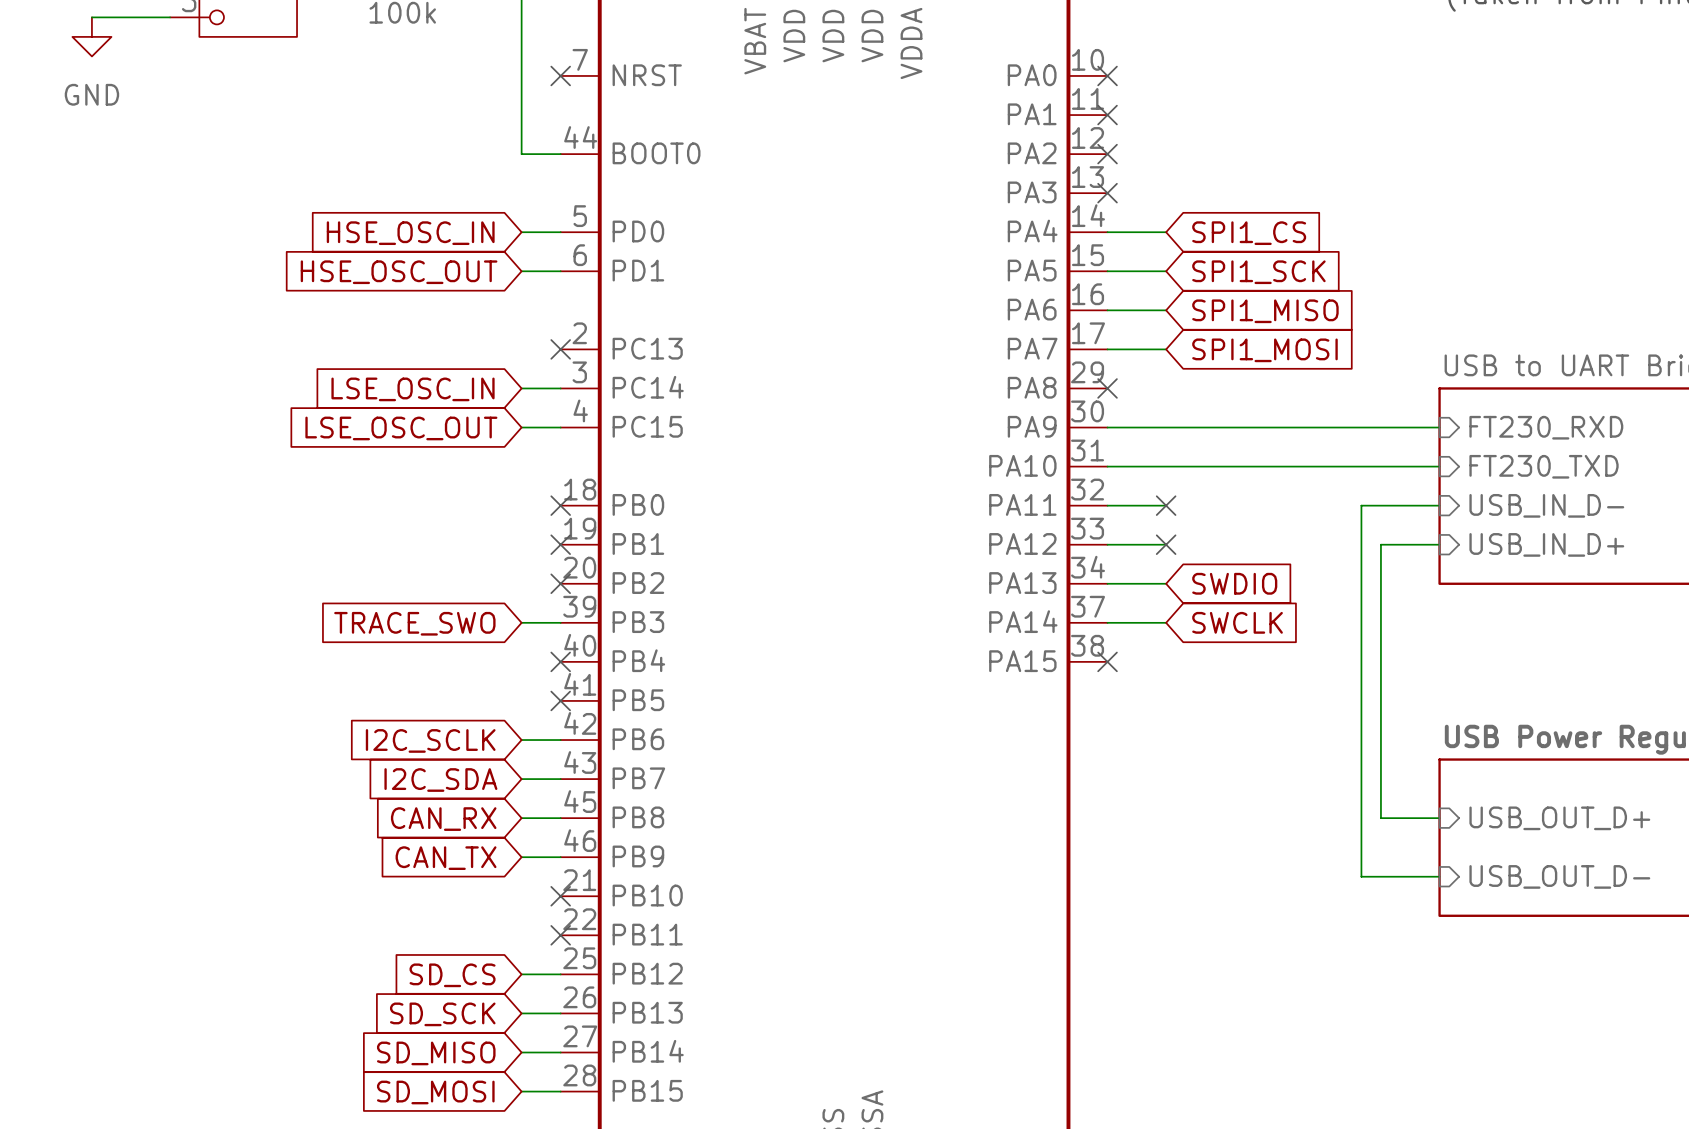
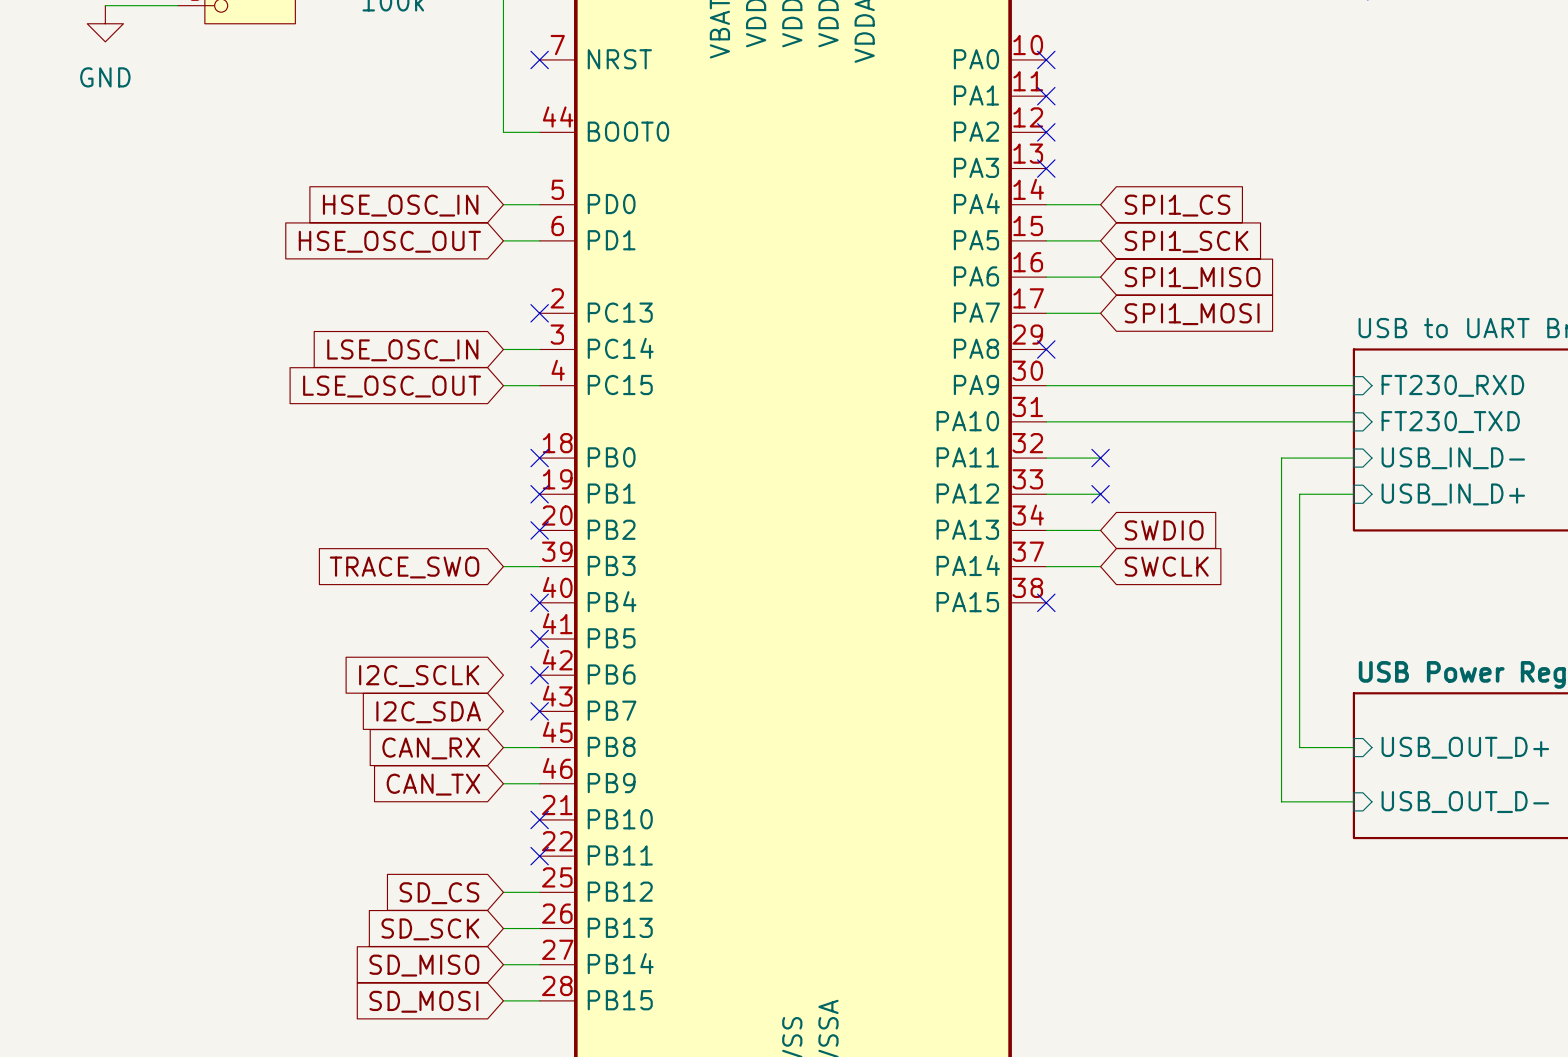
wire: (521, 740) (560, 740) -> none
no-connect mark: none -> (539, 675)
wire: (521, 779) (560, 779) -> none
no-connect mark: none -> (539, 711)

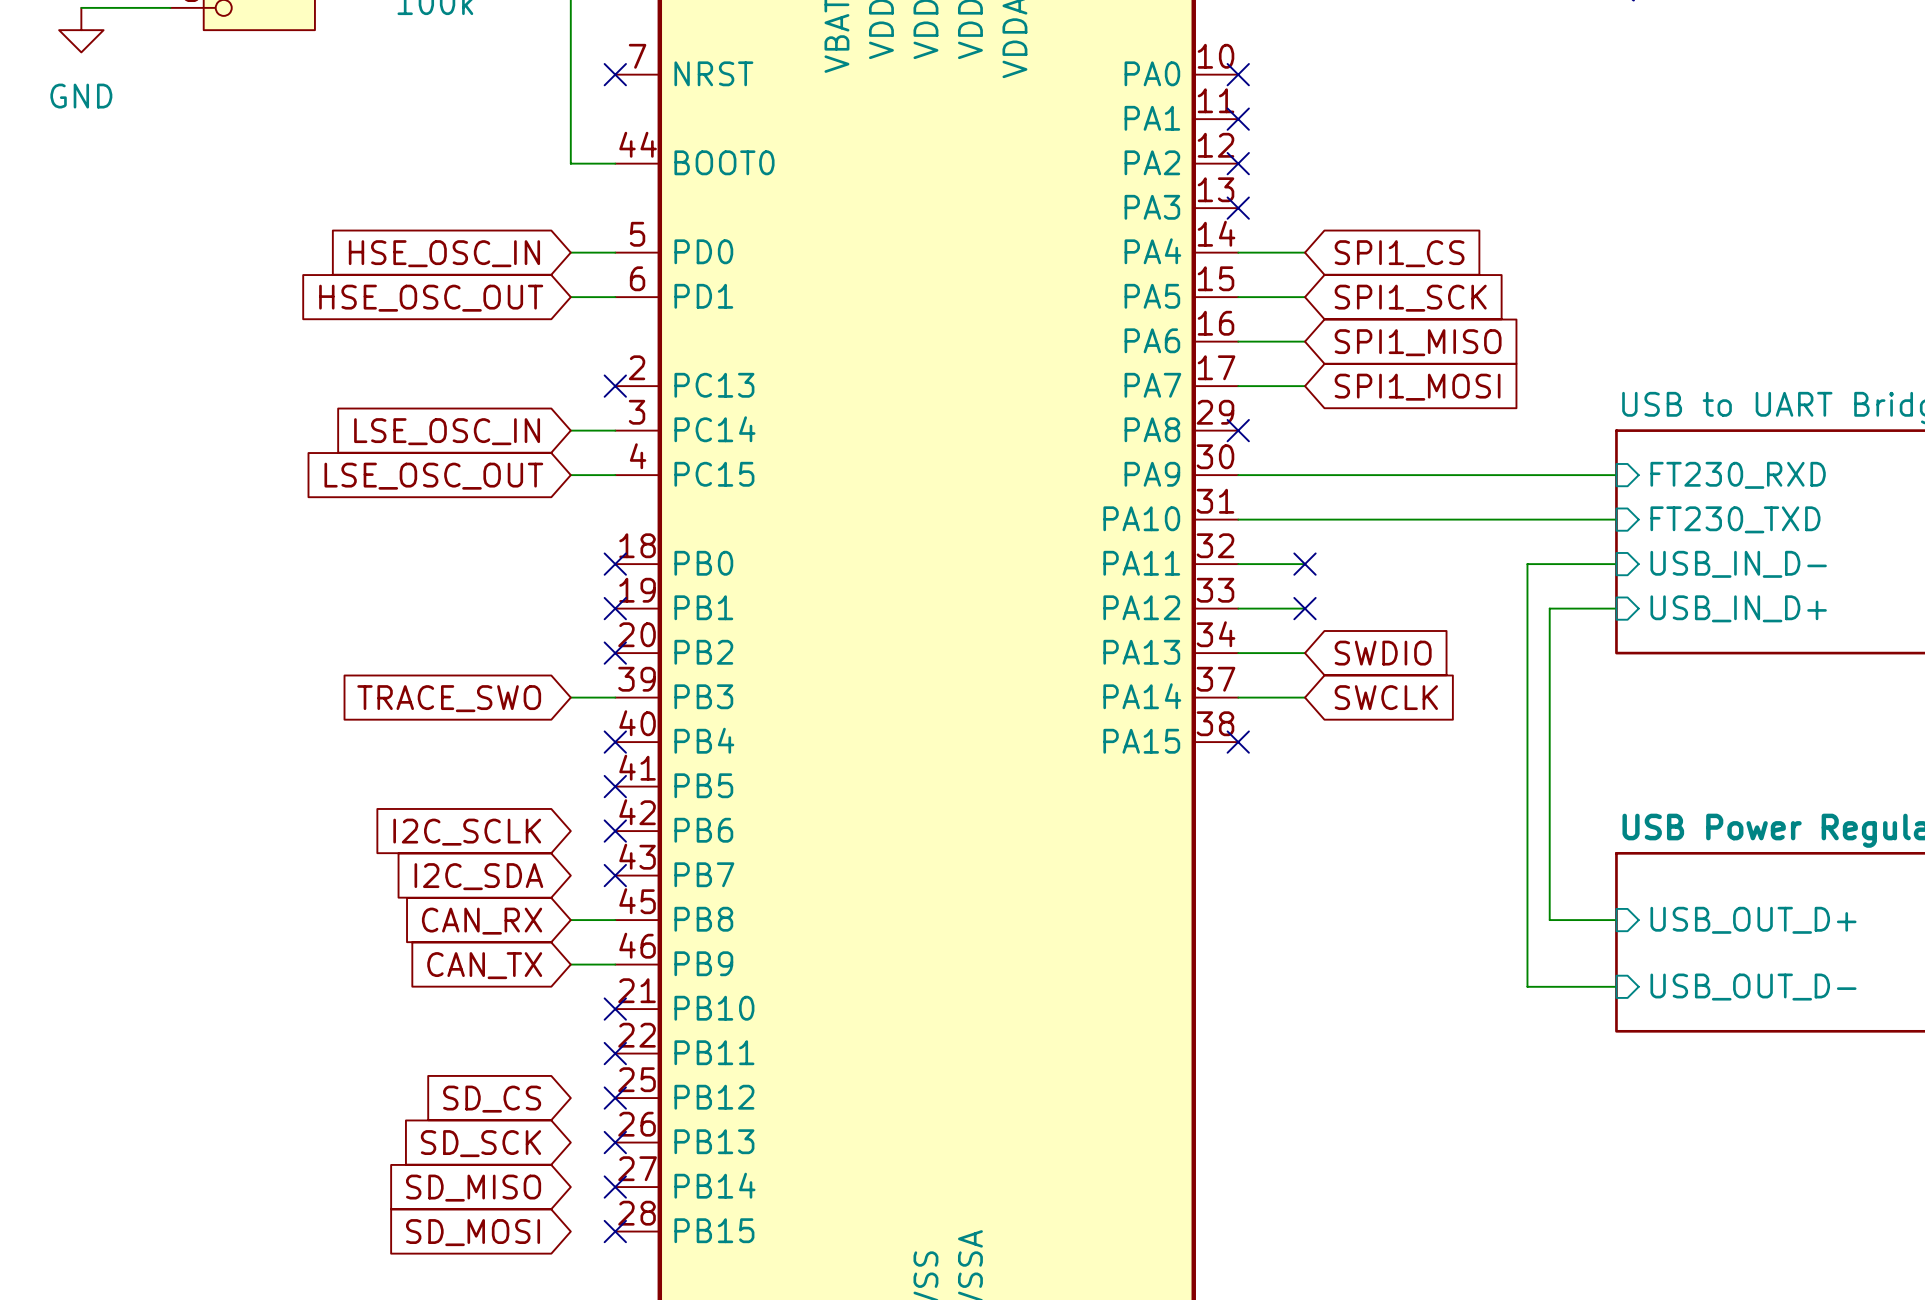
wire: (503, 892) (539, 892) -> none
no-connect mark: none -> (615, 1098)
wire: (503, 928) (539, 928) -> none
no-connect mark: none -> (615, 1142)
wire: (503, 964) (539, 964) -> none
no-connect mark: none -> (615, 1187)
wire: (503, 1000) (539, 1000) -> none
no-connect mark: none -> (615, 1231)

